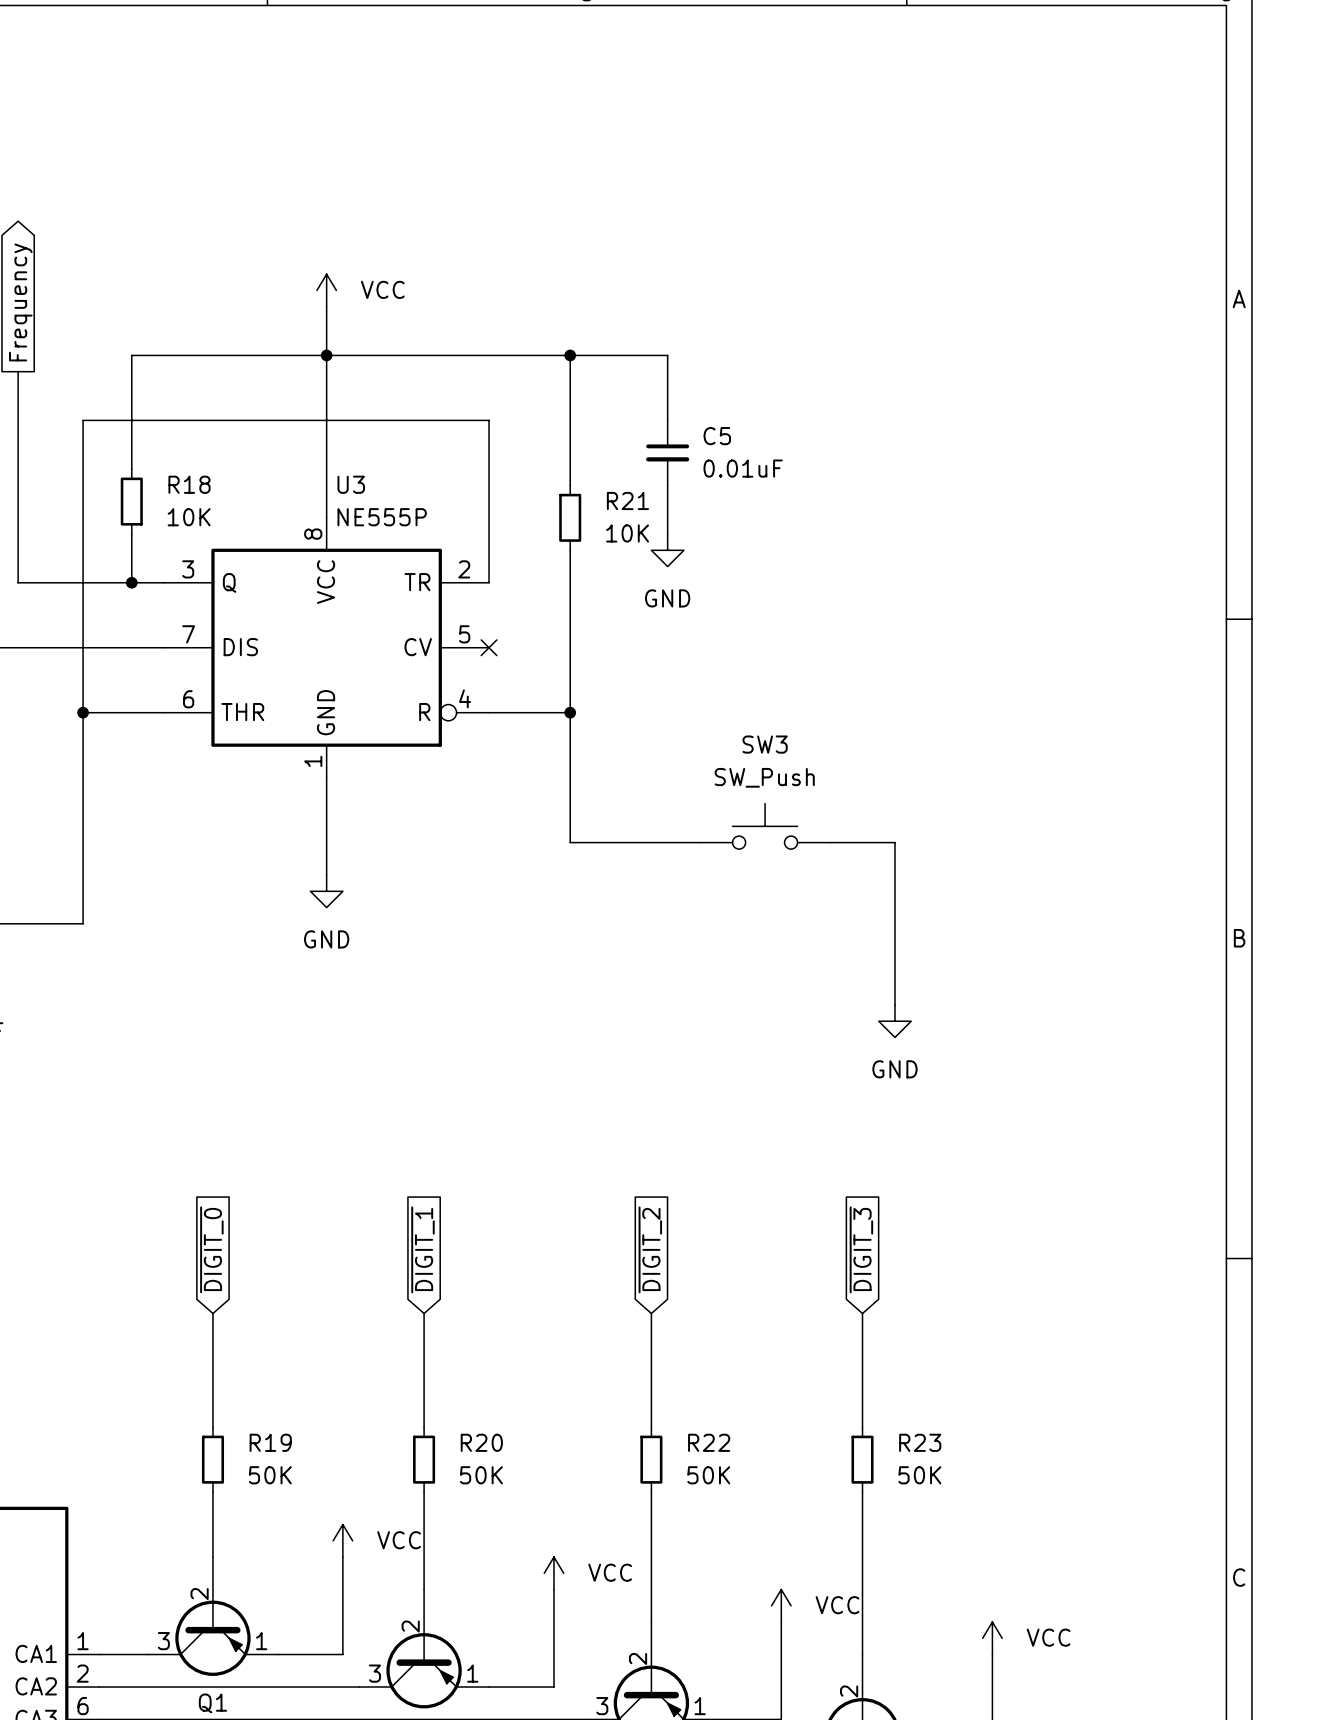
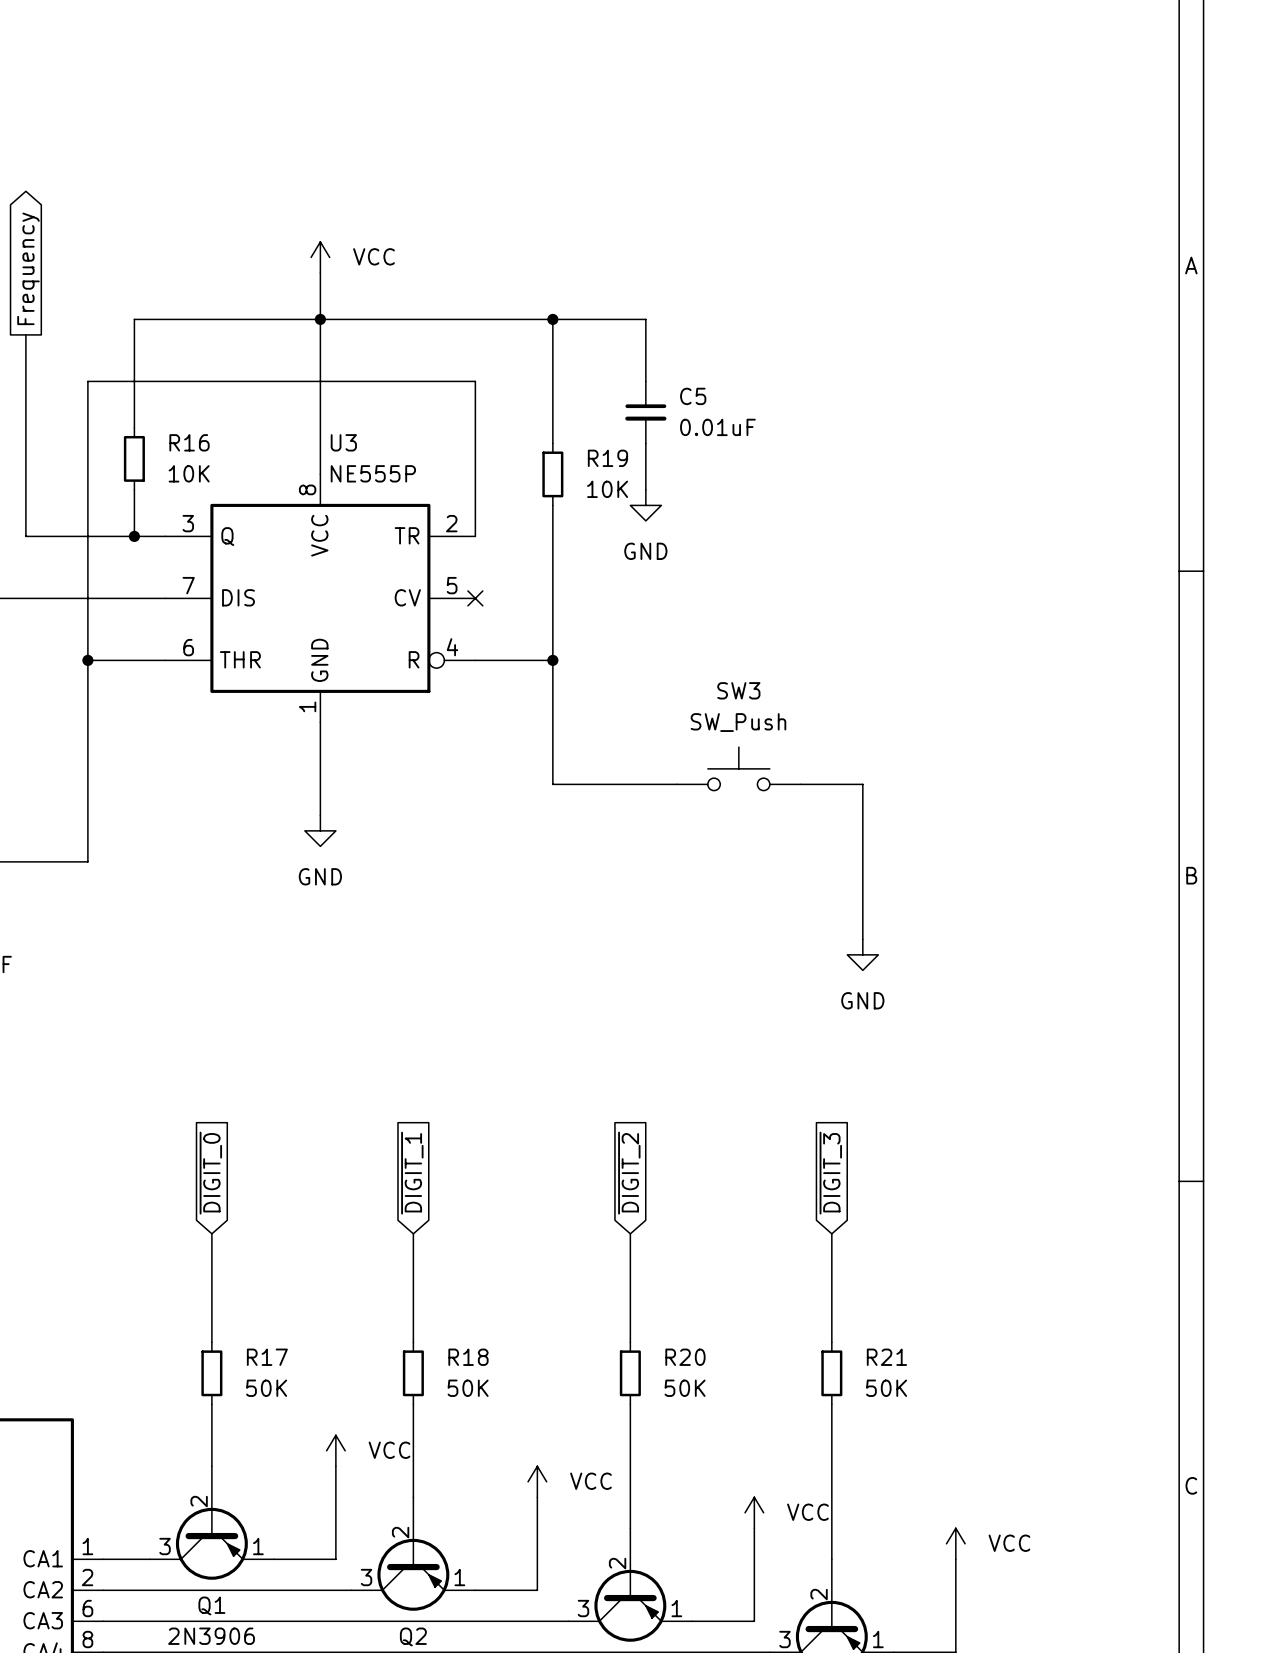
R18 name: R18 (189, 484) -> R16 (189, 442)
R21 name: R21 (627, 500) -> R19 (607, 458)
R19 name: R19 (270, 1442) -> R17 (267, 1357)
R20 name: R20 (481, 1442) -> R18 (468, 1357)
R22 name: R22 (709, 1442) -> R20 (685, 1357)
R23 name: R23 (920, 1442) -> R21 (886, 1357)

